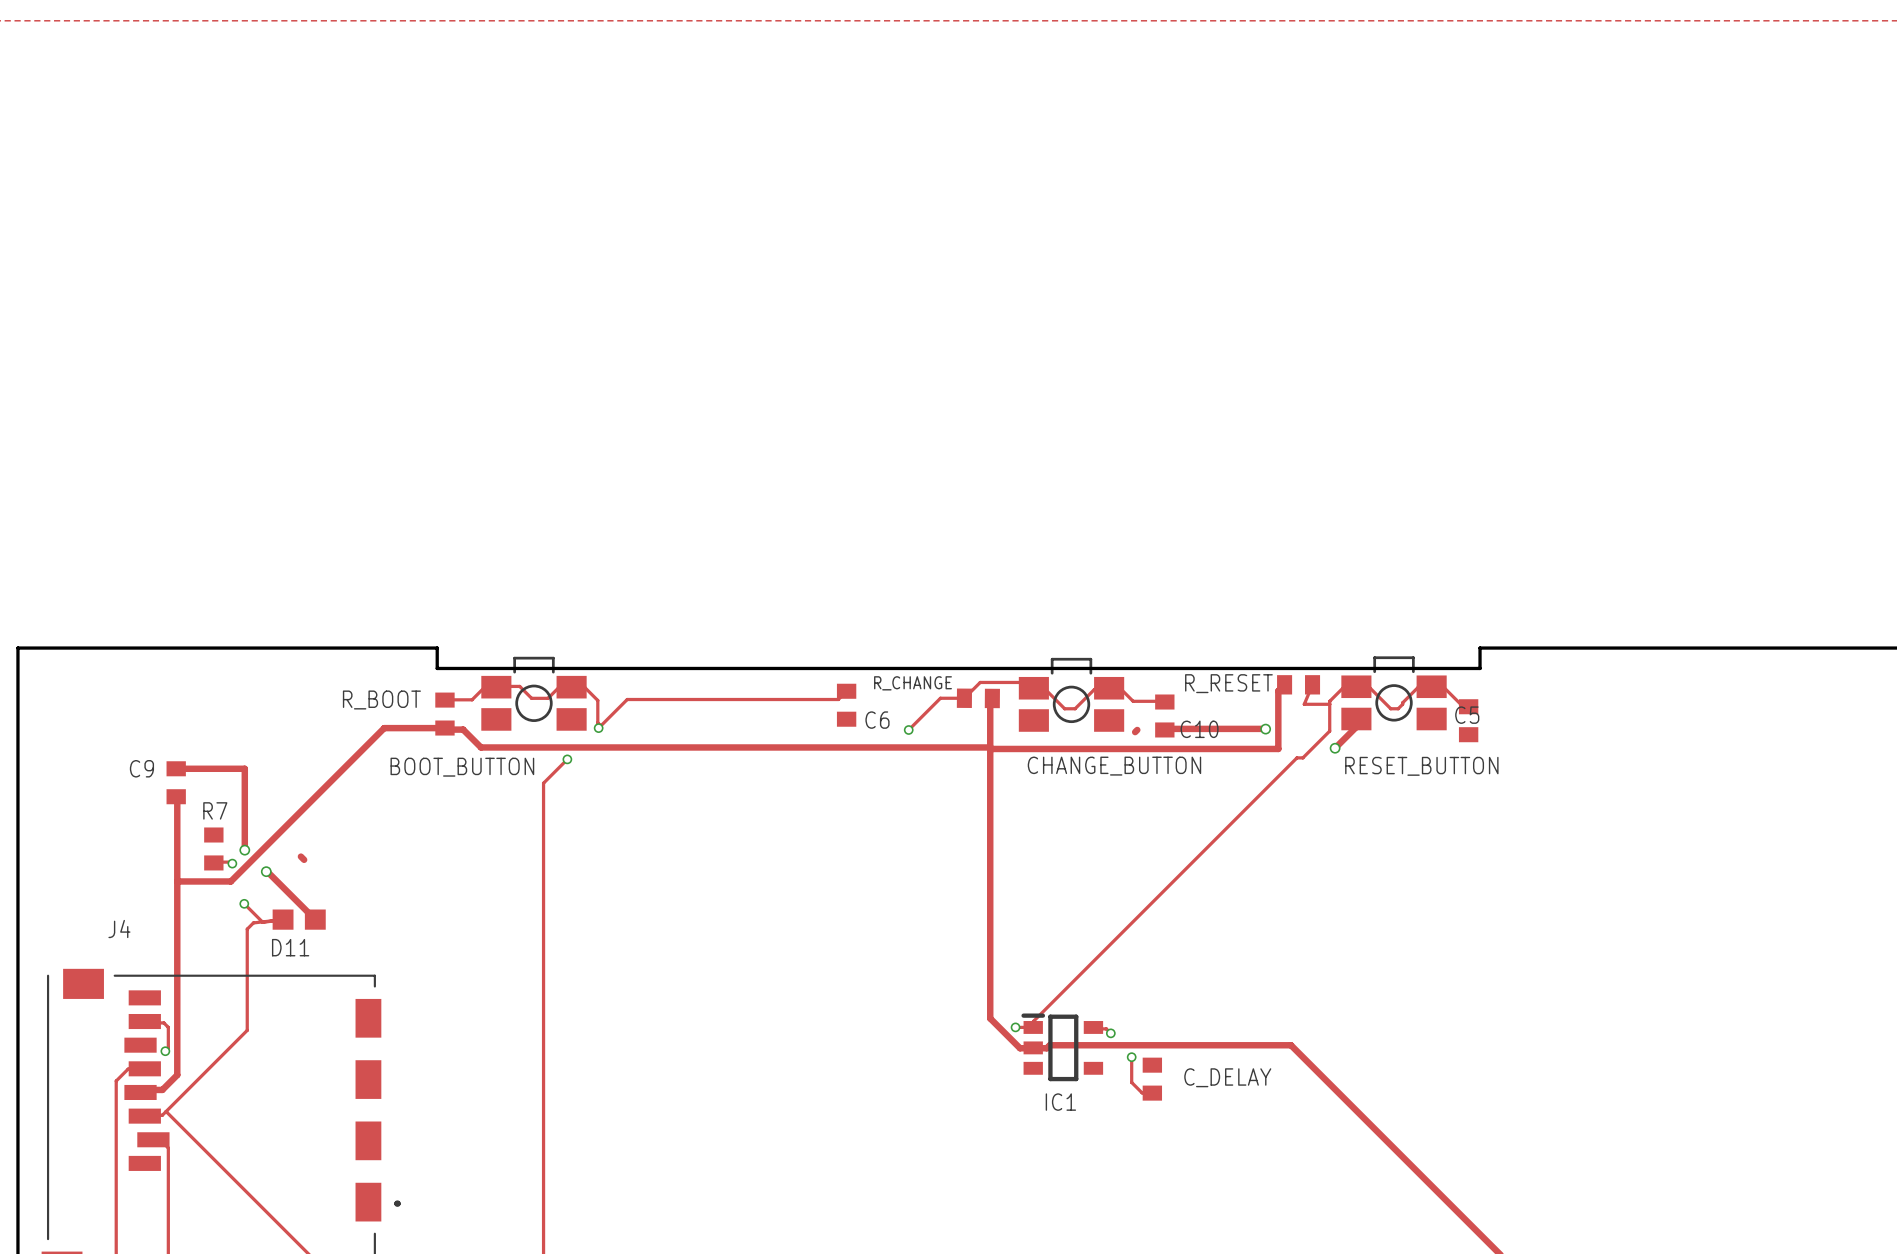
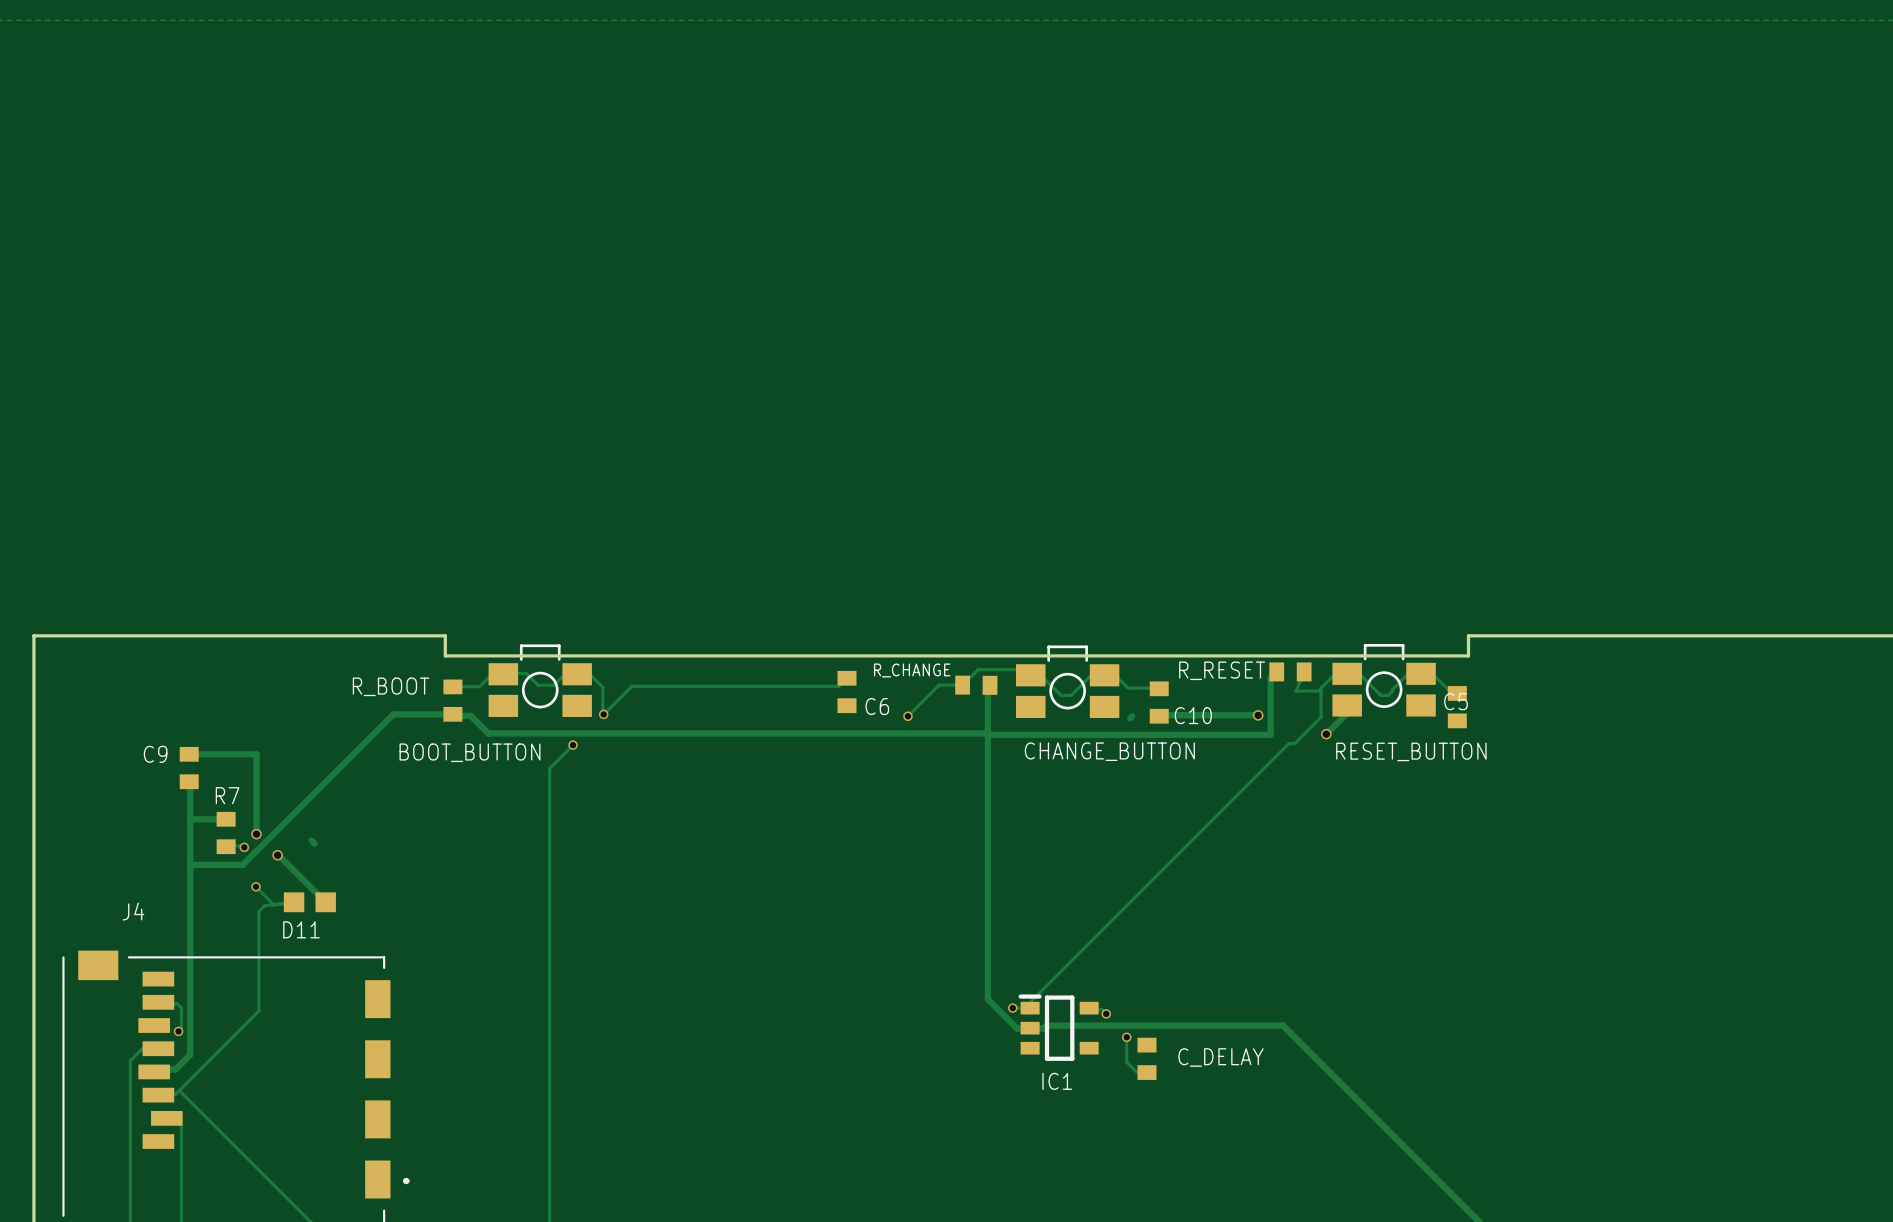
track: none -> (226, 819) (190, 820)

